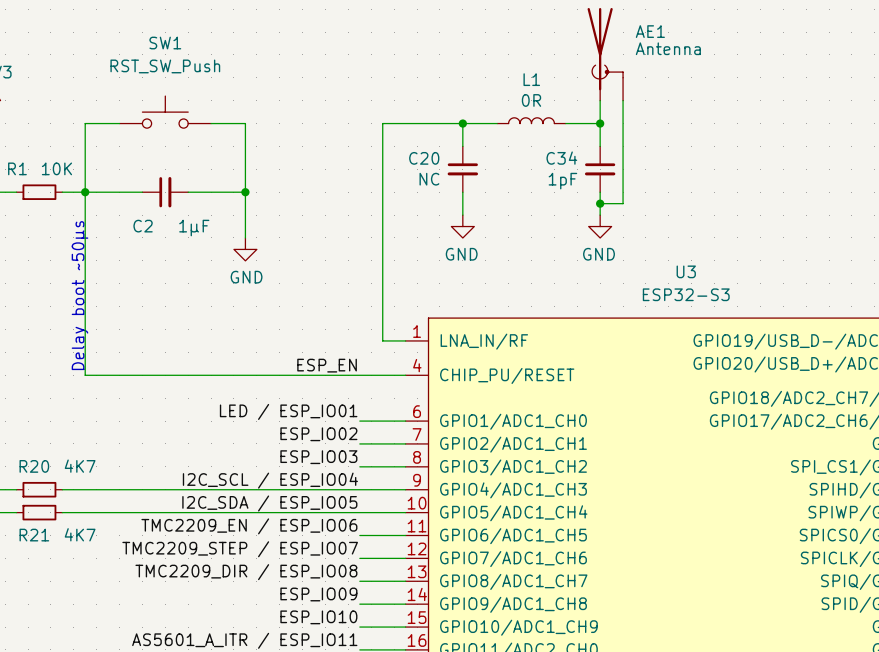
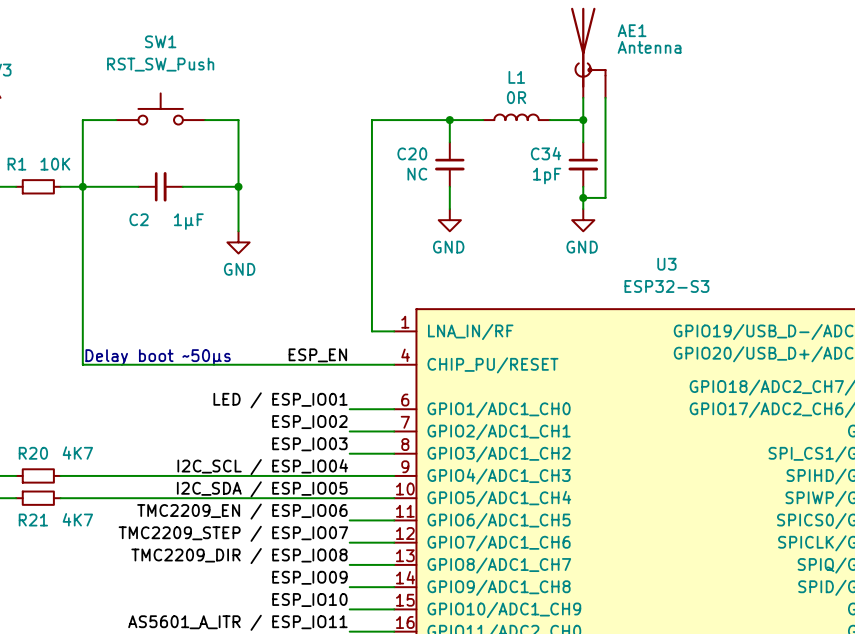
text rotation: 0° (80, 295) -> 90° clockwise (158, 357)

